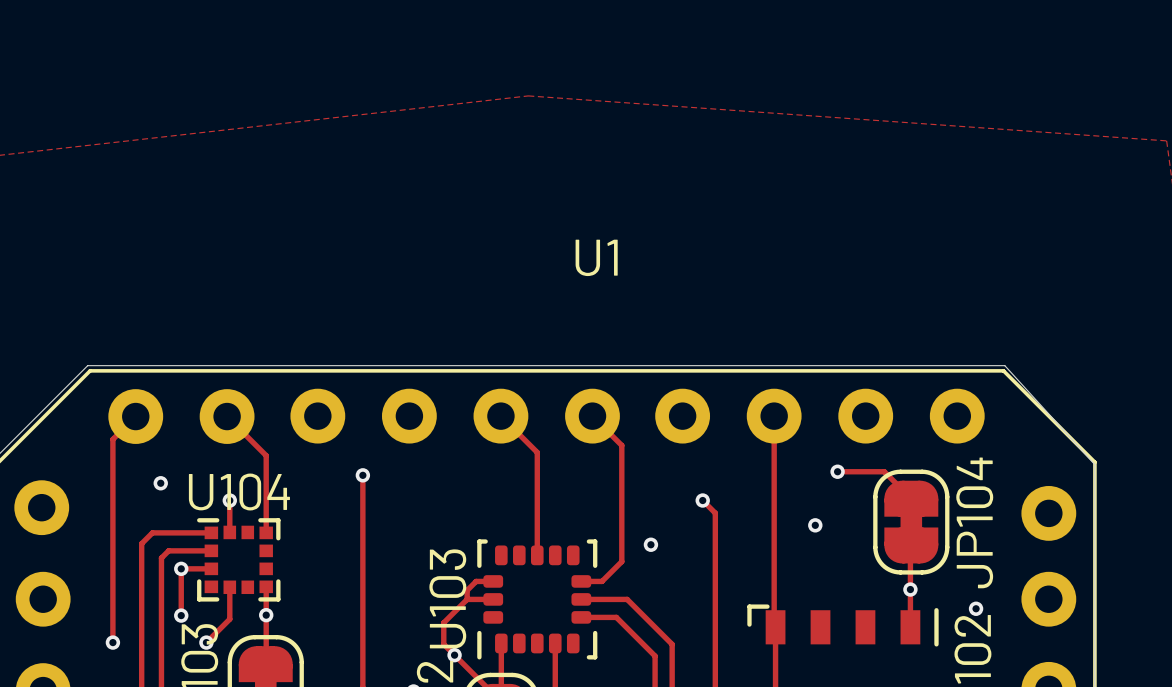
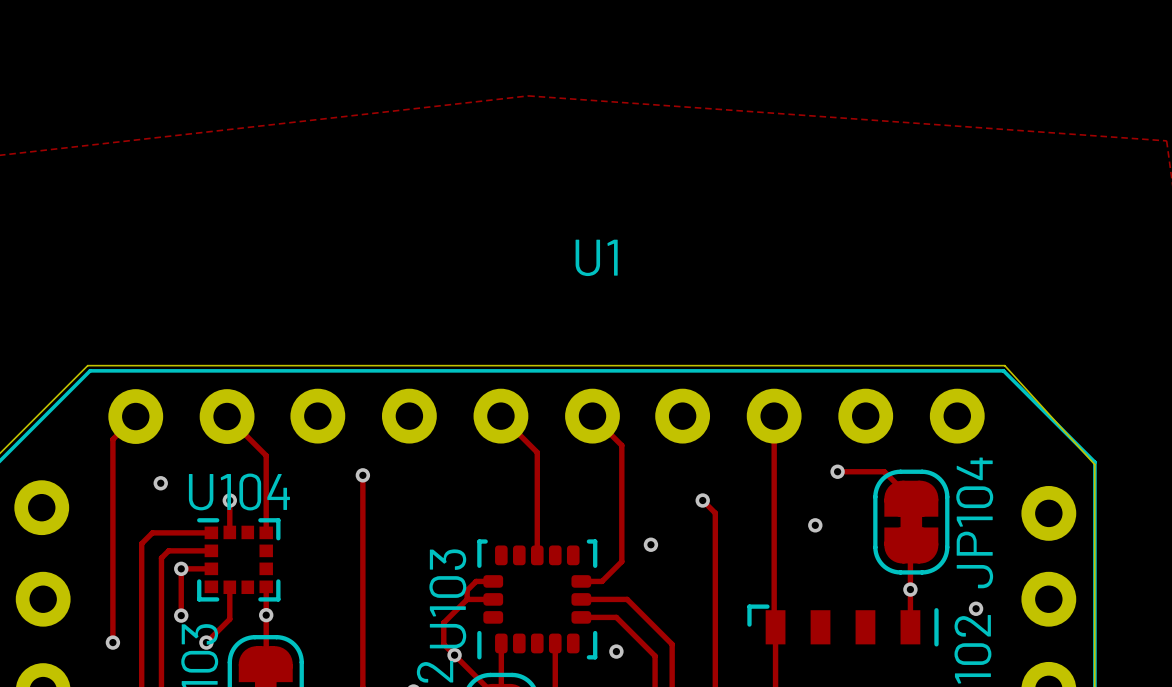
via: none -> (616, 651)

